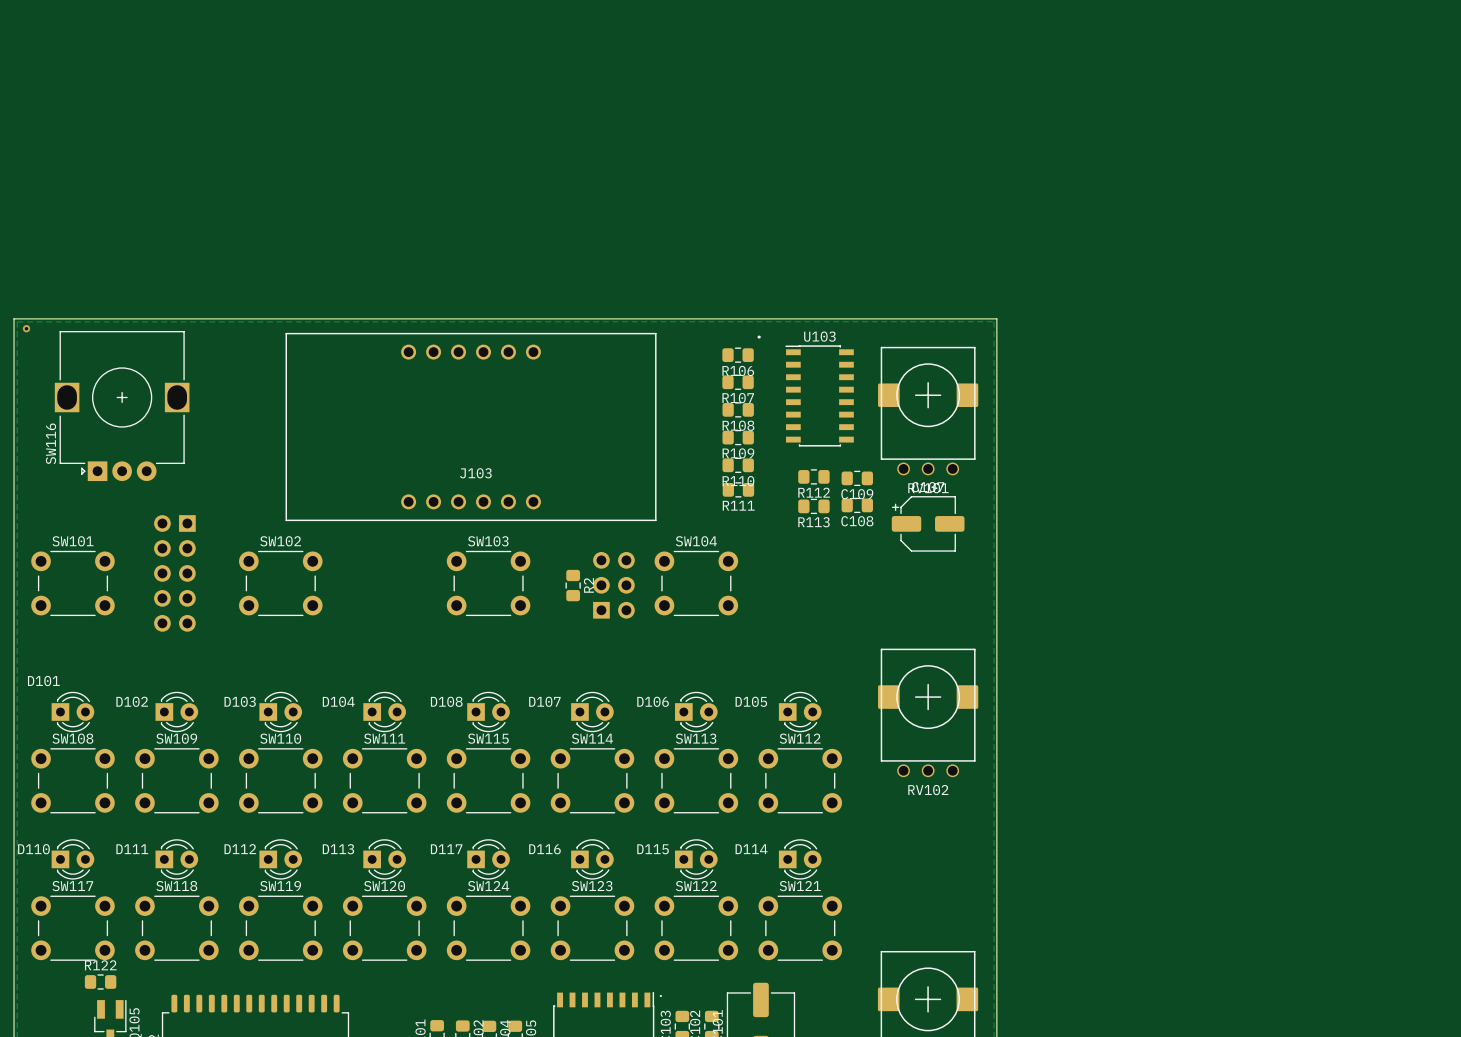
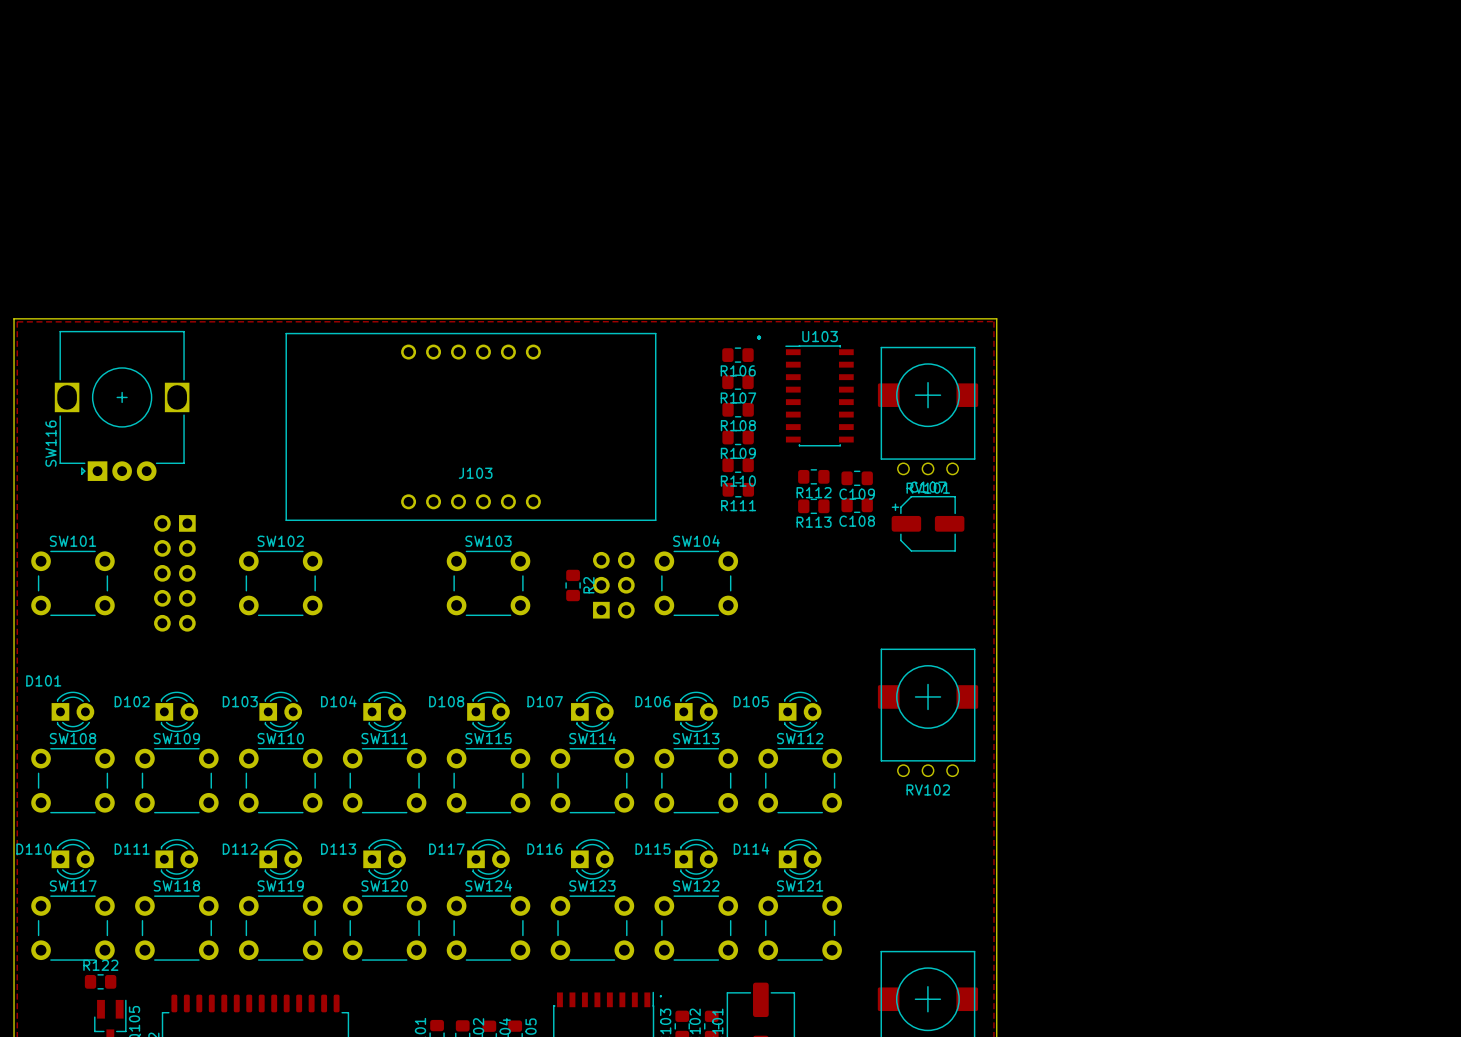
via: (26, 328) -> none

